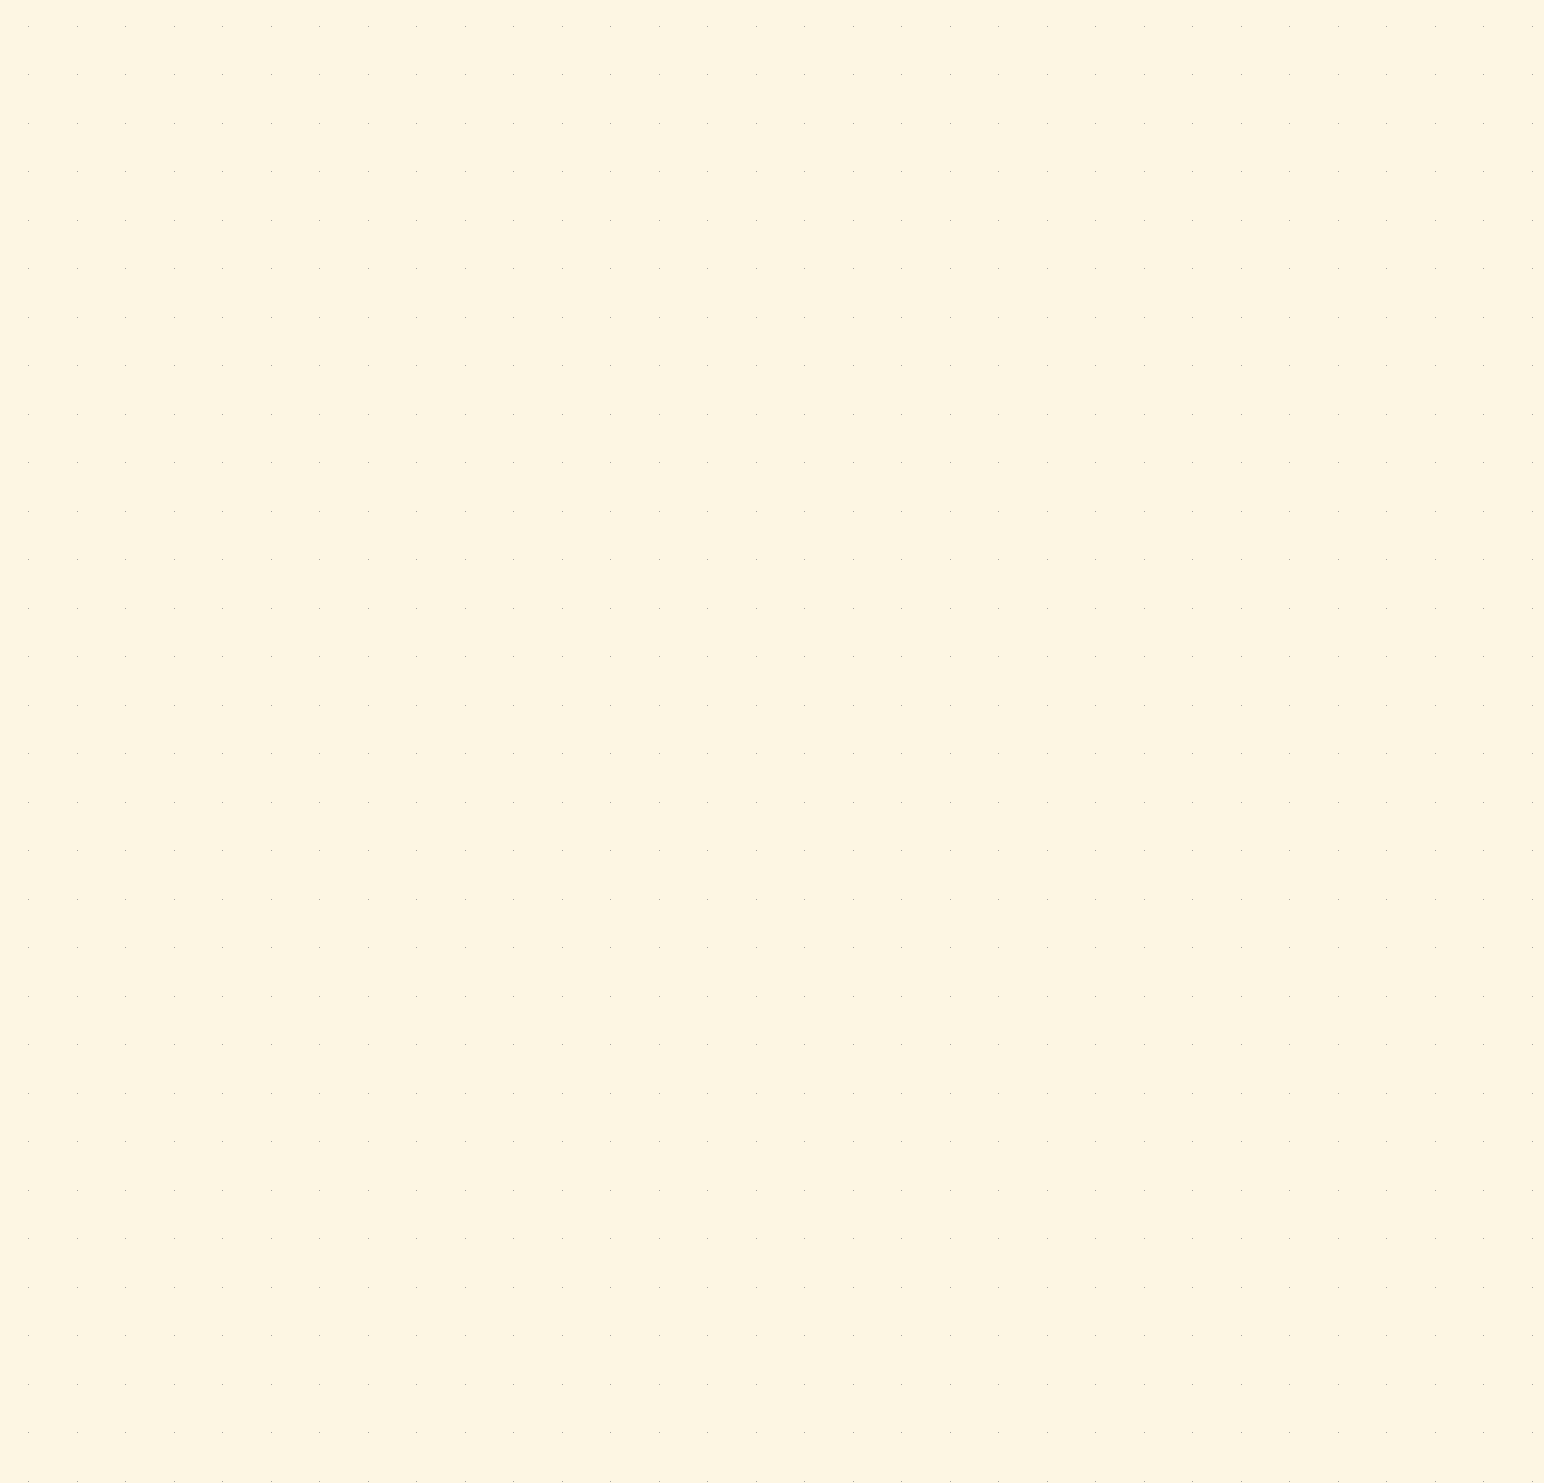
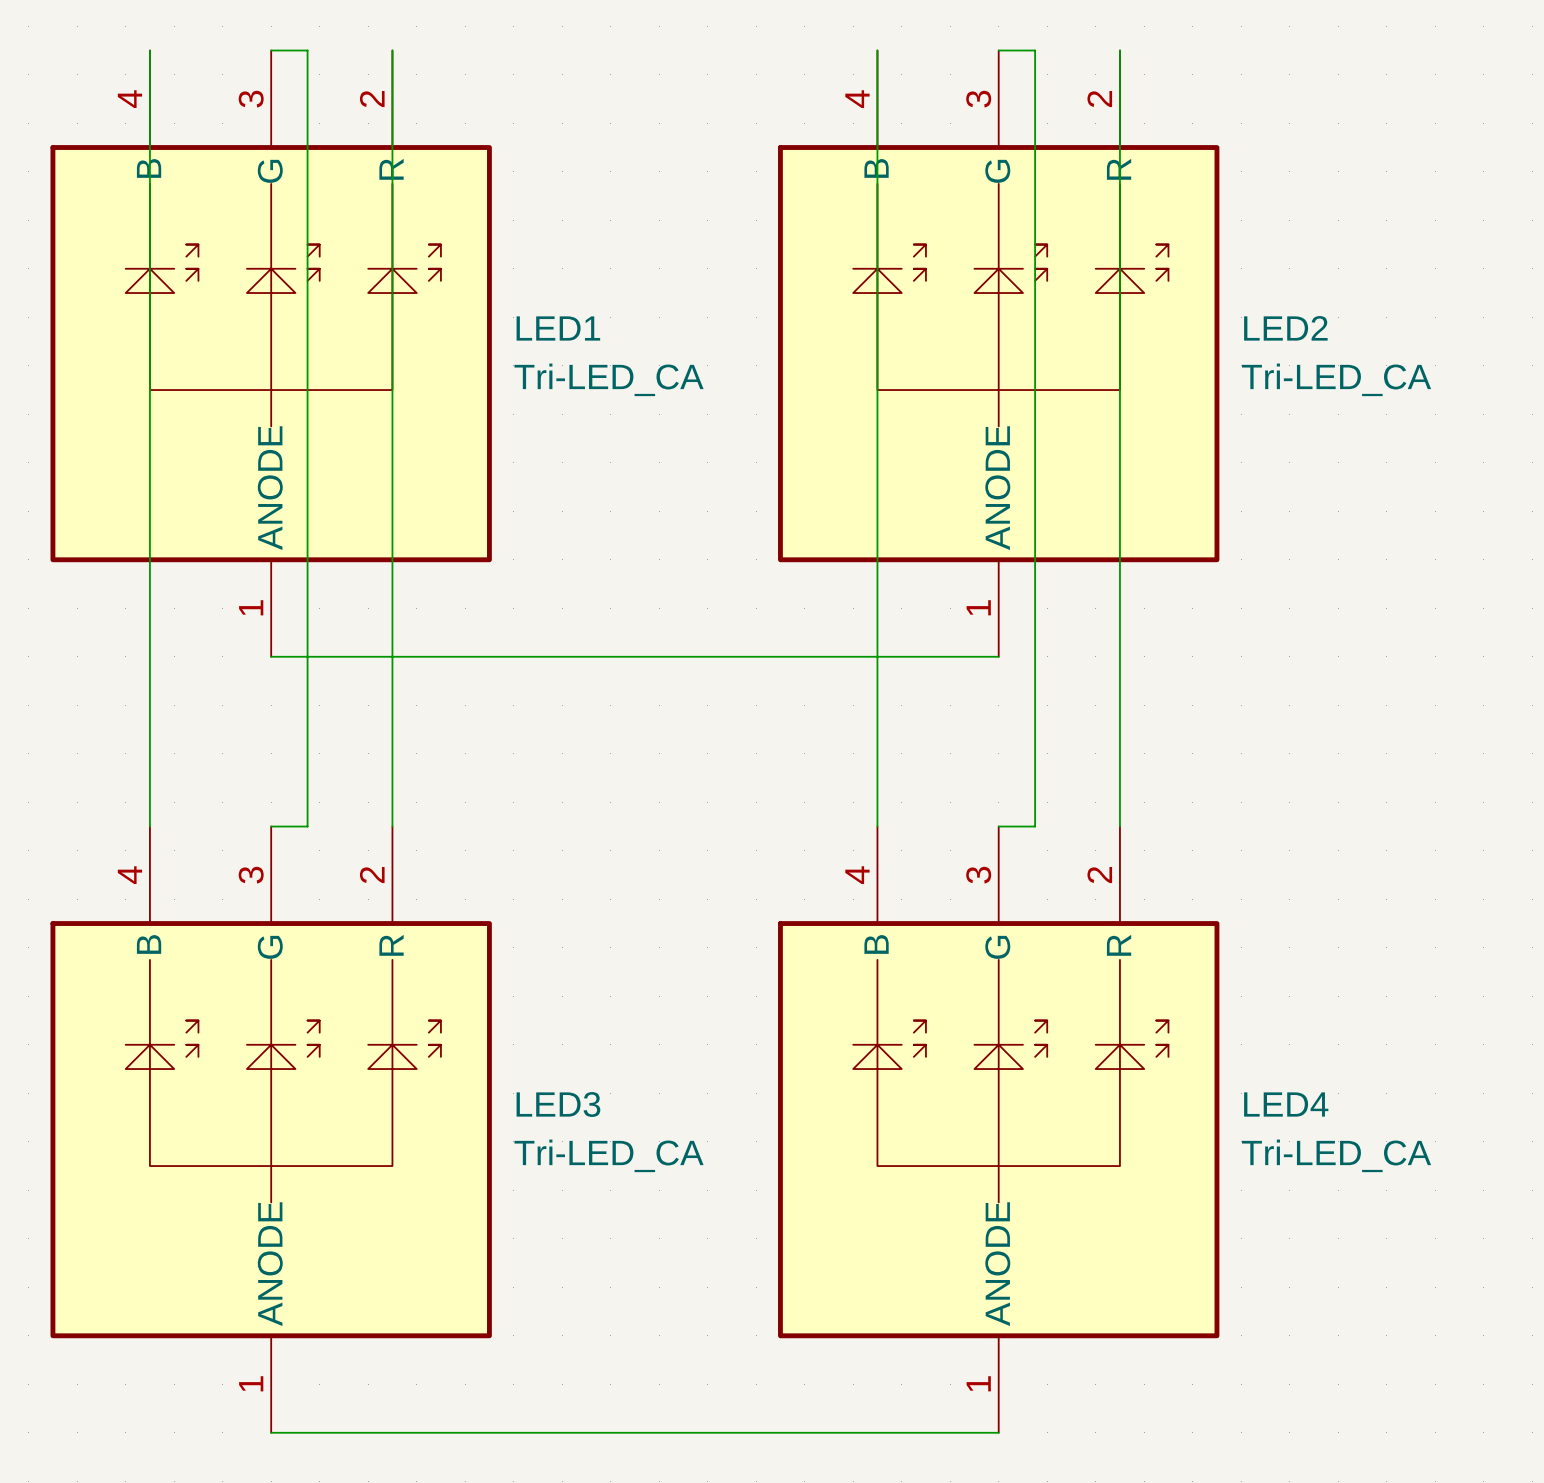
wire: none -> (149, 50) (149, 826)
wire: none -> (271, 50) (307, 50) (307, 826) (271, 826)
wire: none -> (392, 50) (392, 826)
wire: none -> (877, 50) (877, 826)
wire: none -> (998, 50) (1035, 50) (1035, 826) (998, 826)
wire: none -> (1119, 50) (1119, 826)
LED1: none -> Tri-LED_CA (271, 353)
LED2: none -> Tri-LED_CA (998, 353)
wire: none -> (271, 656) (998, 656)
LED3: none -> Tri-LED_CA (271, 1129)
LED4: none -> Tri-LED_CA (998, 1129)
wire: none -> (271, 1432) (998, 1432)

